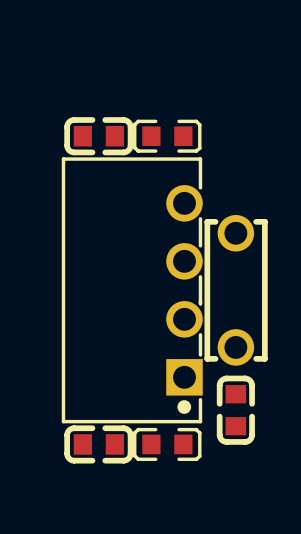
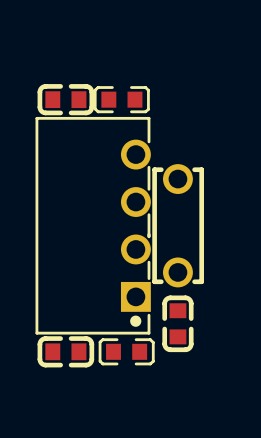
part rotation: 0° (167, 444) -> 180° (126, 351)

